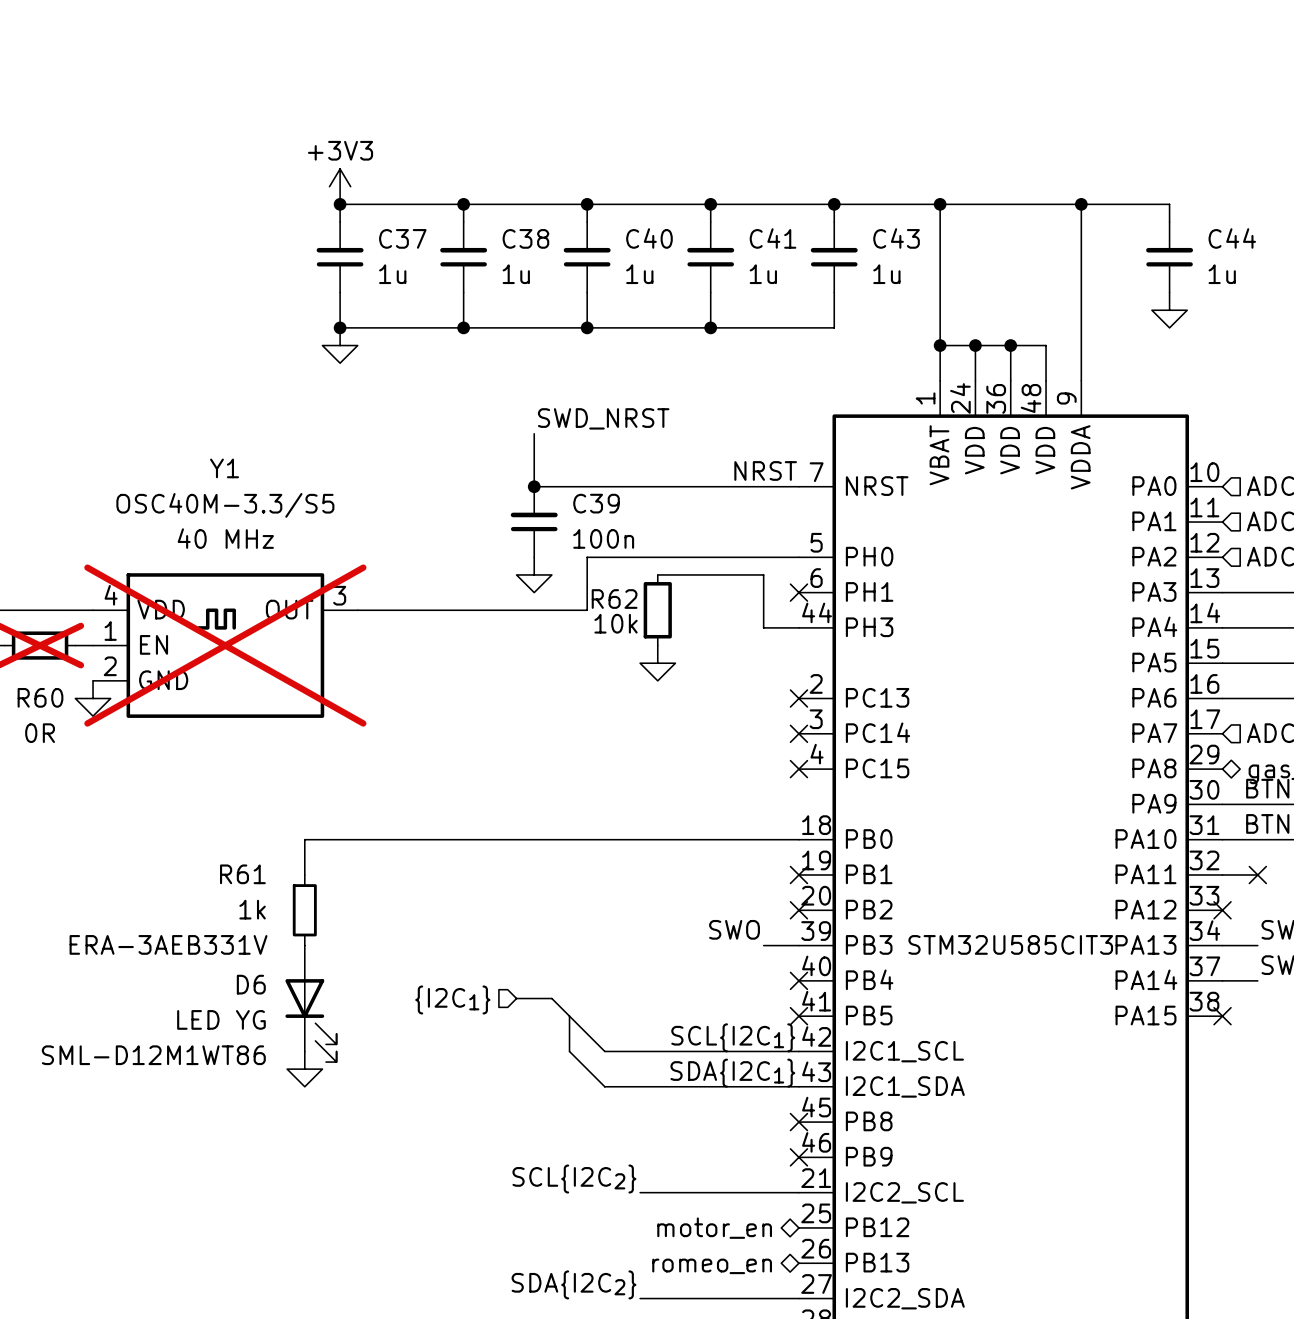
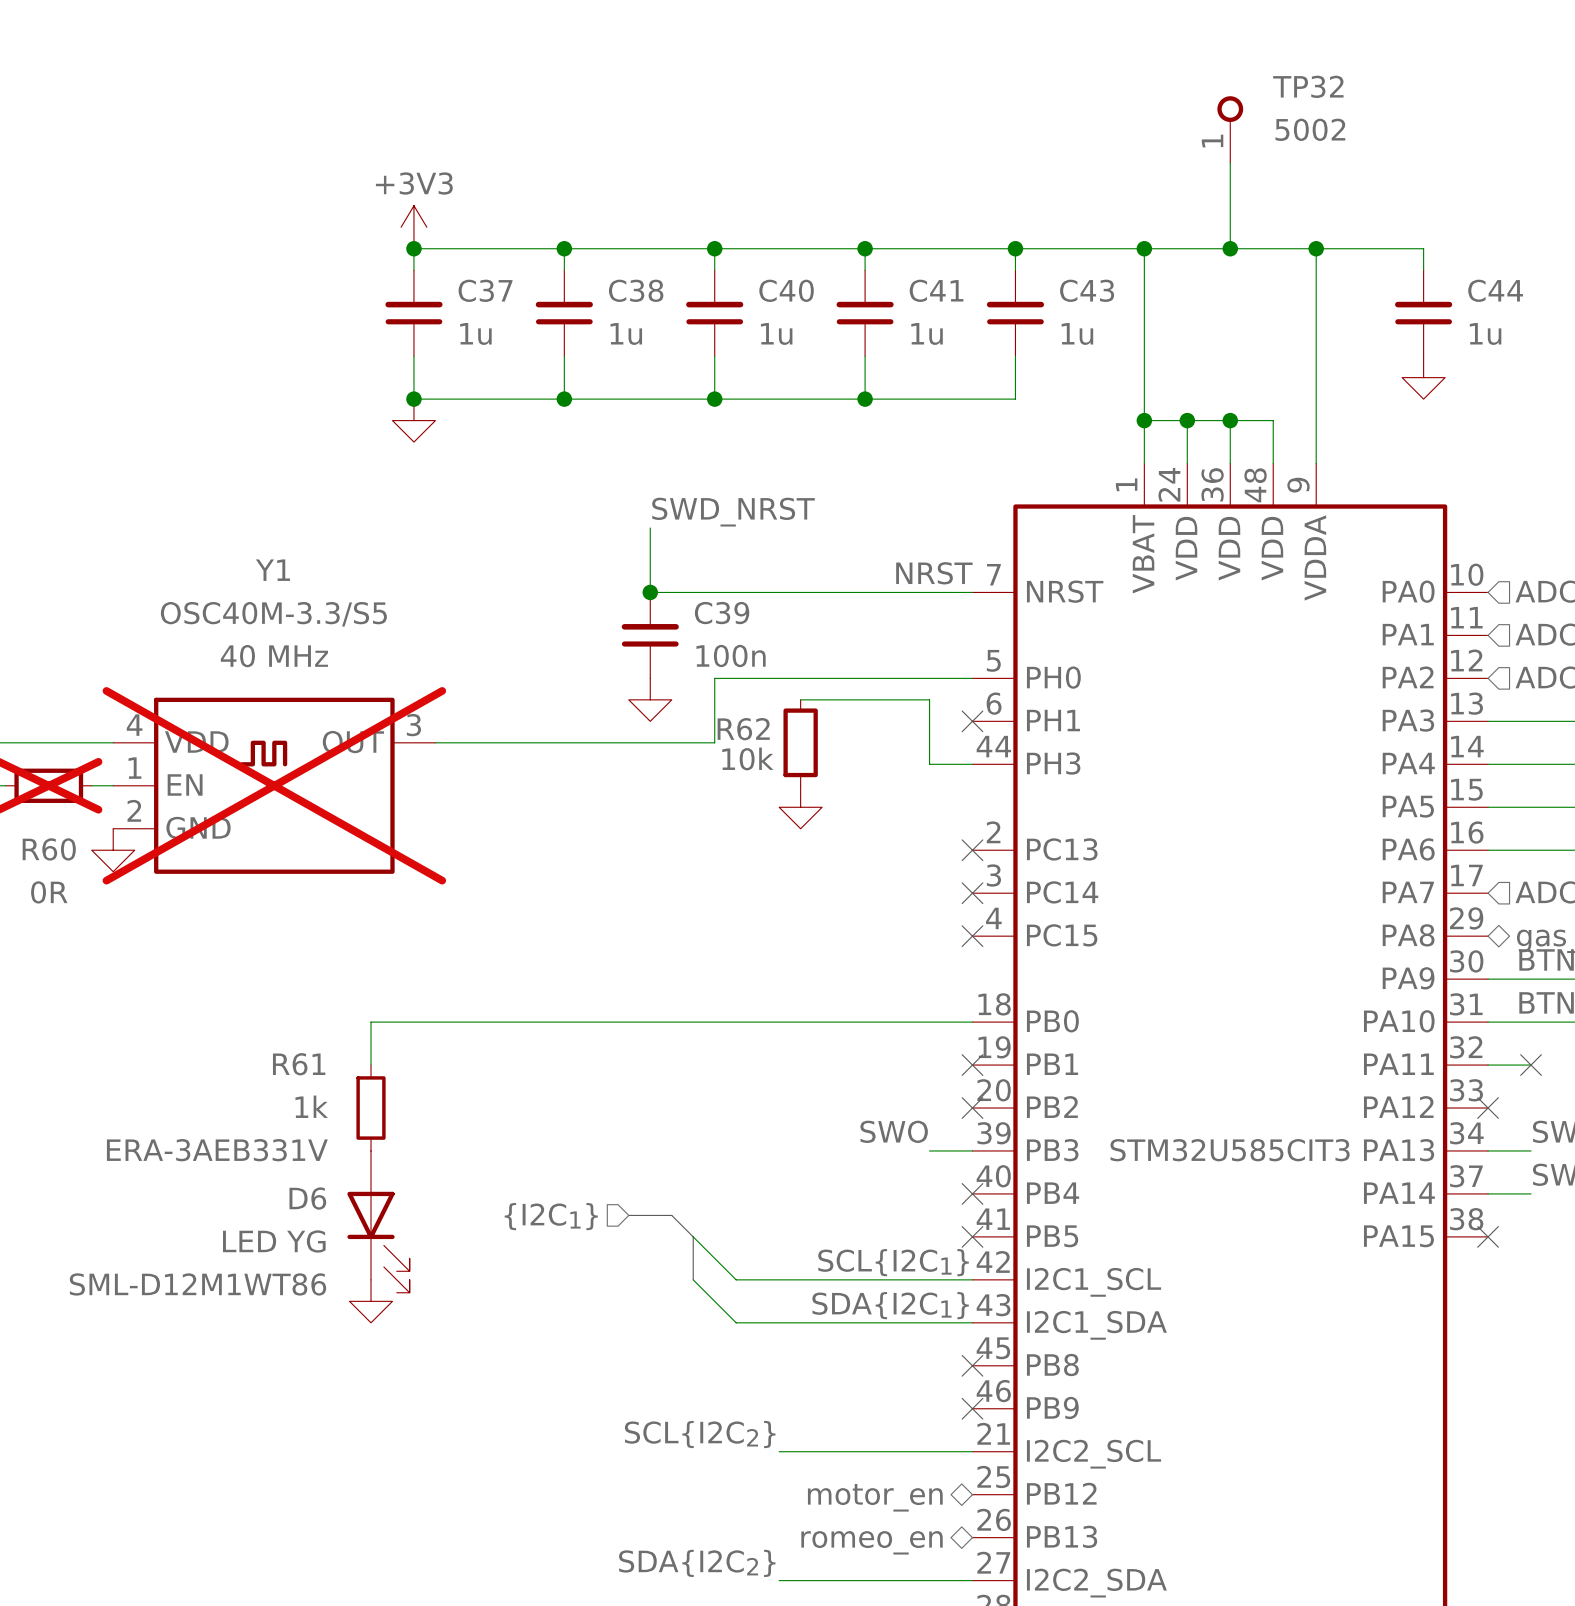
TP32: none -> (1230, 129)
wire: none -> (1230, 162) (1230, 248)
junction: none -> (1230, 248)

